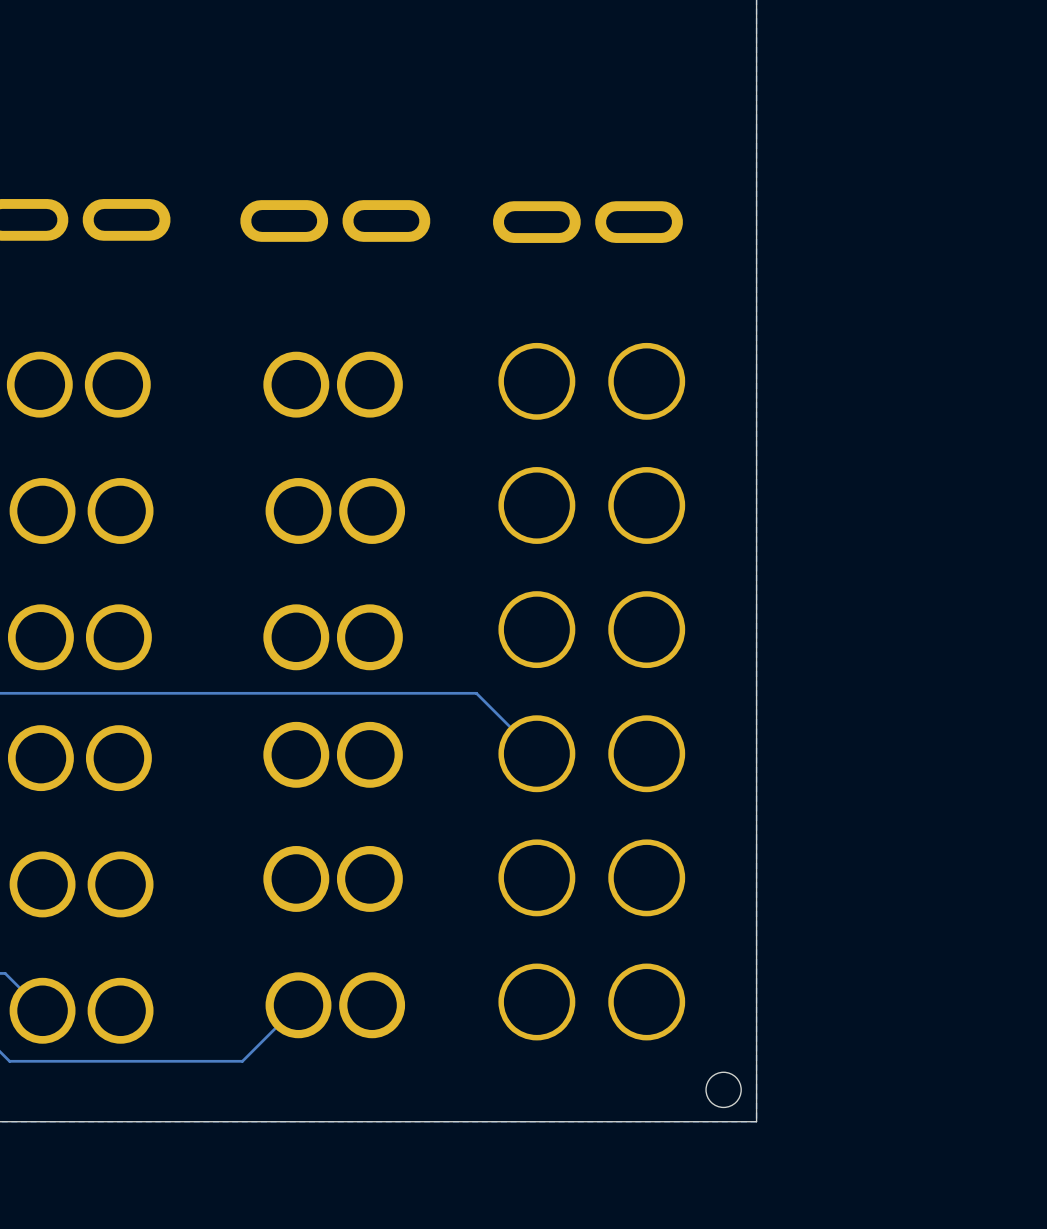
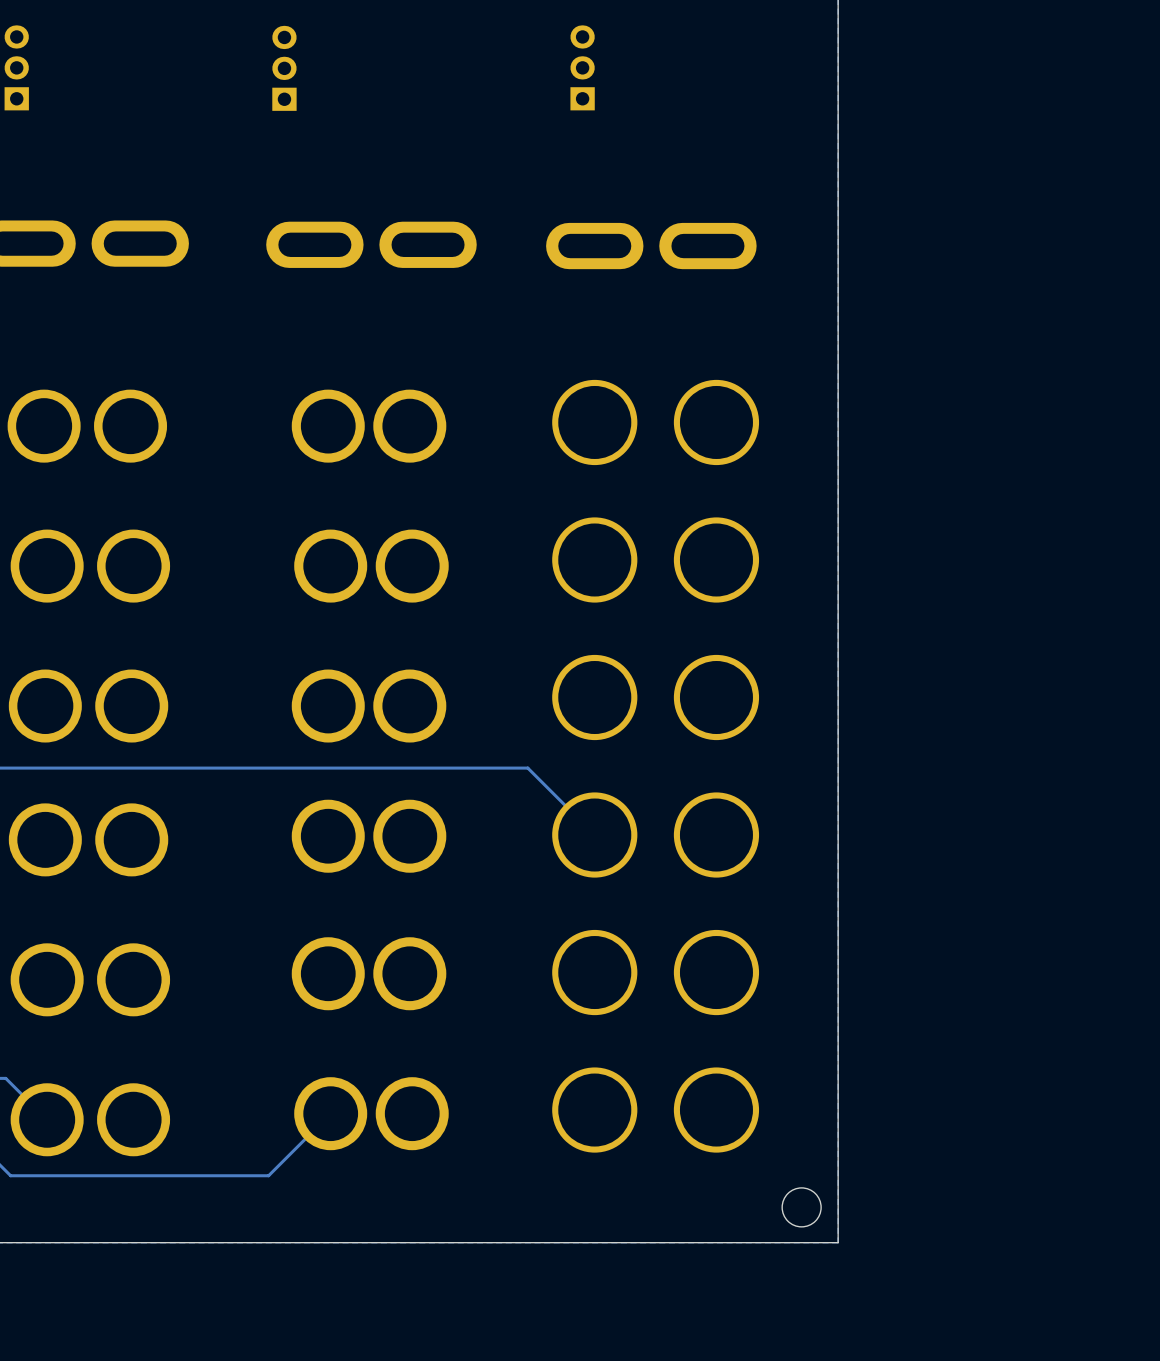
part: none -> (16, 67)
part: none -> (284, 68)
part: none -> (582, 67)

